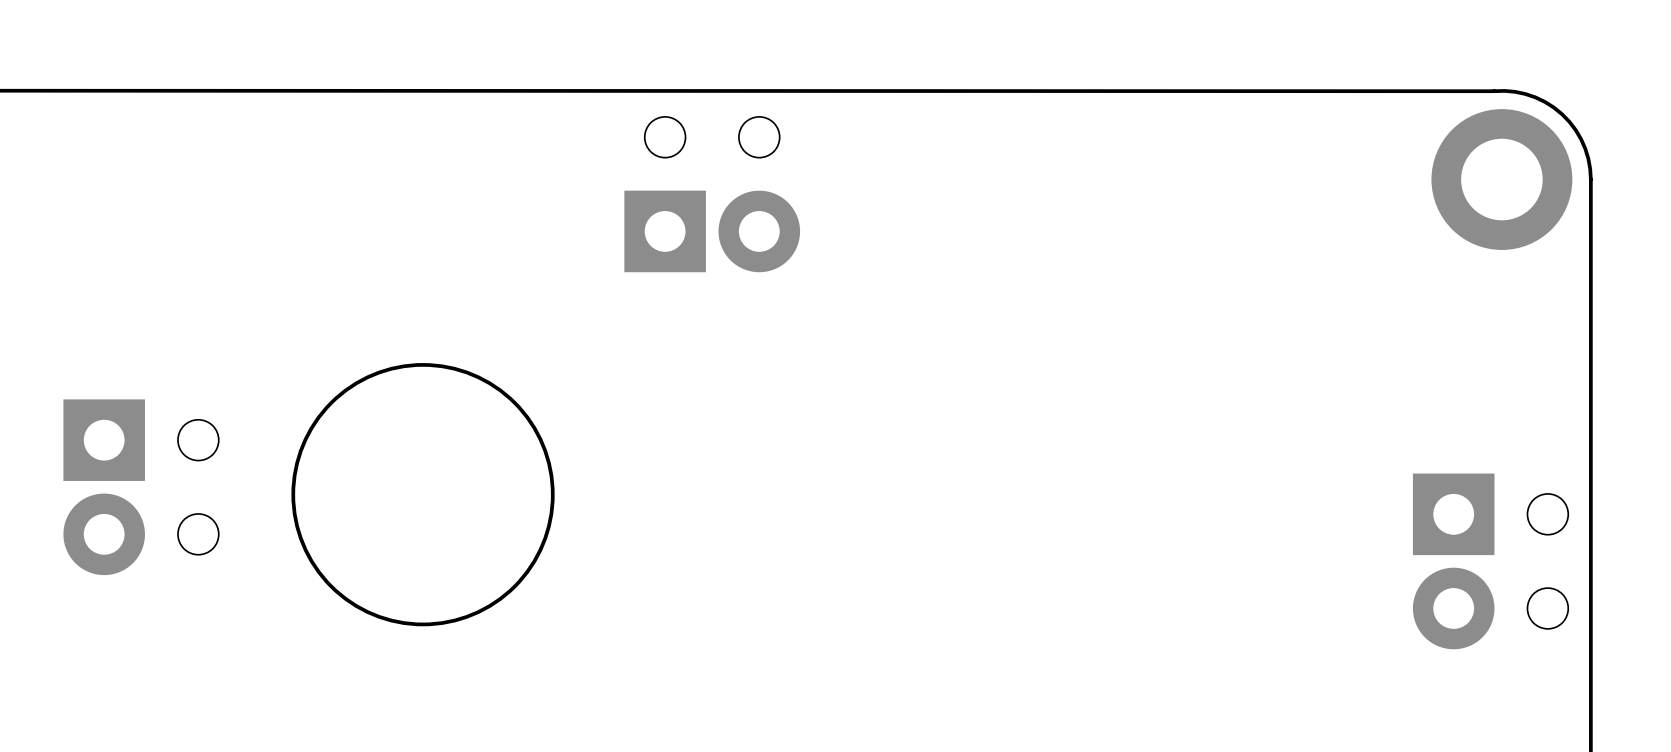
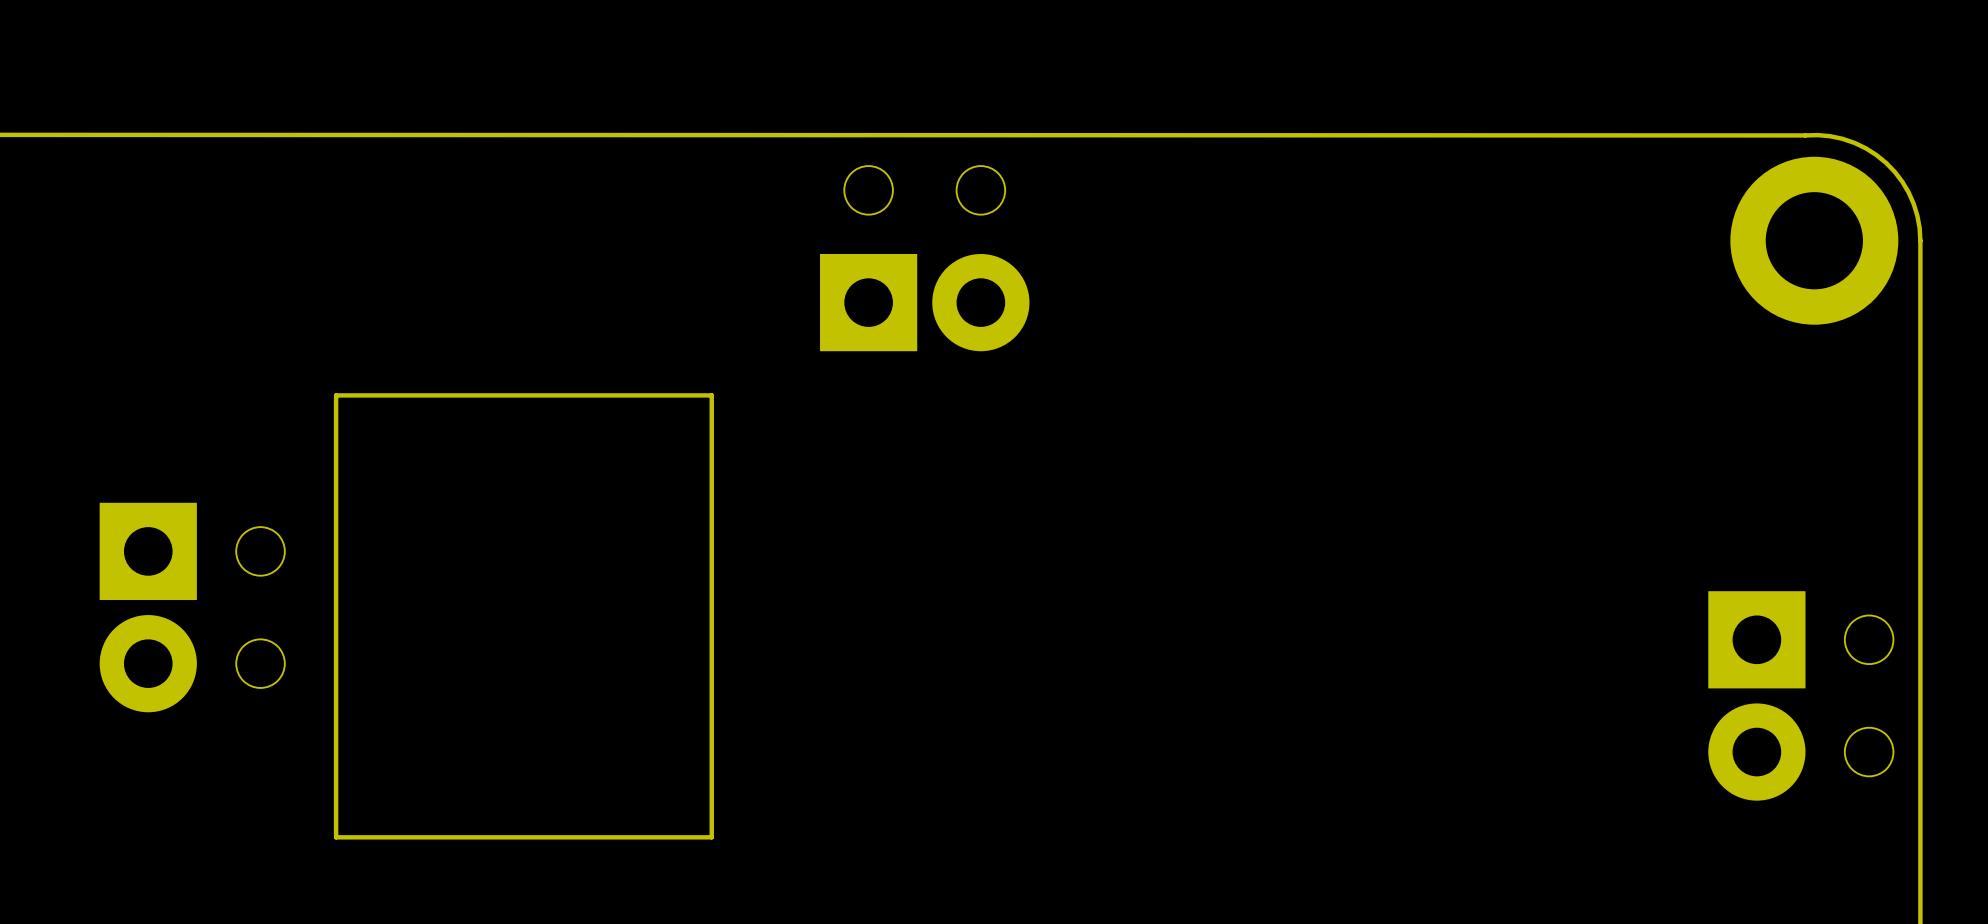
part position: (712, 194) -> (924, 258)
board edge: none -> (711, 395) (336, 395) (336, 837) (711, 837) (711, 395)
round board edge: [291, 363, 555, 627] -> none

